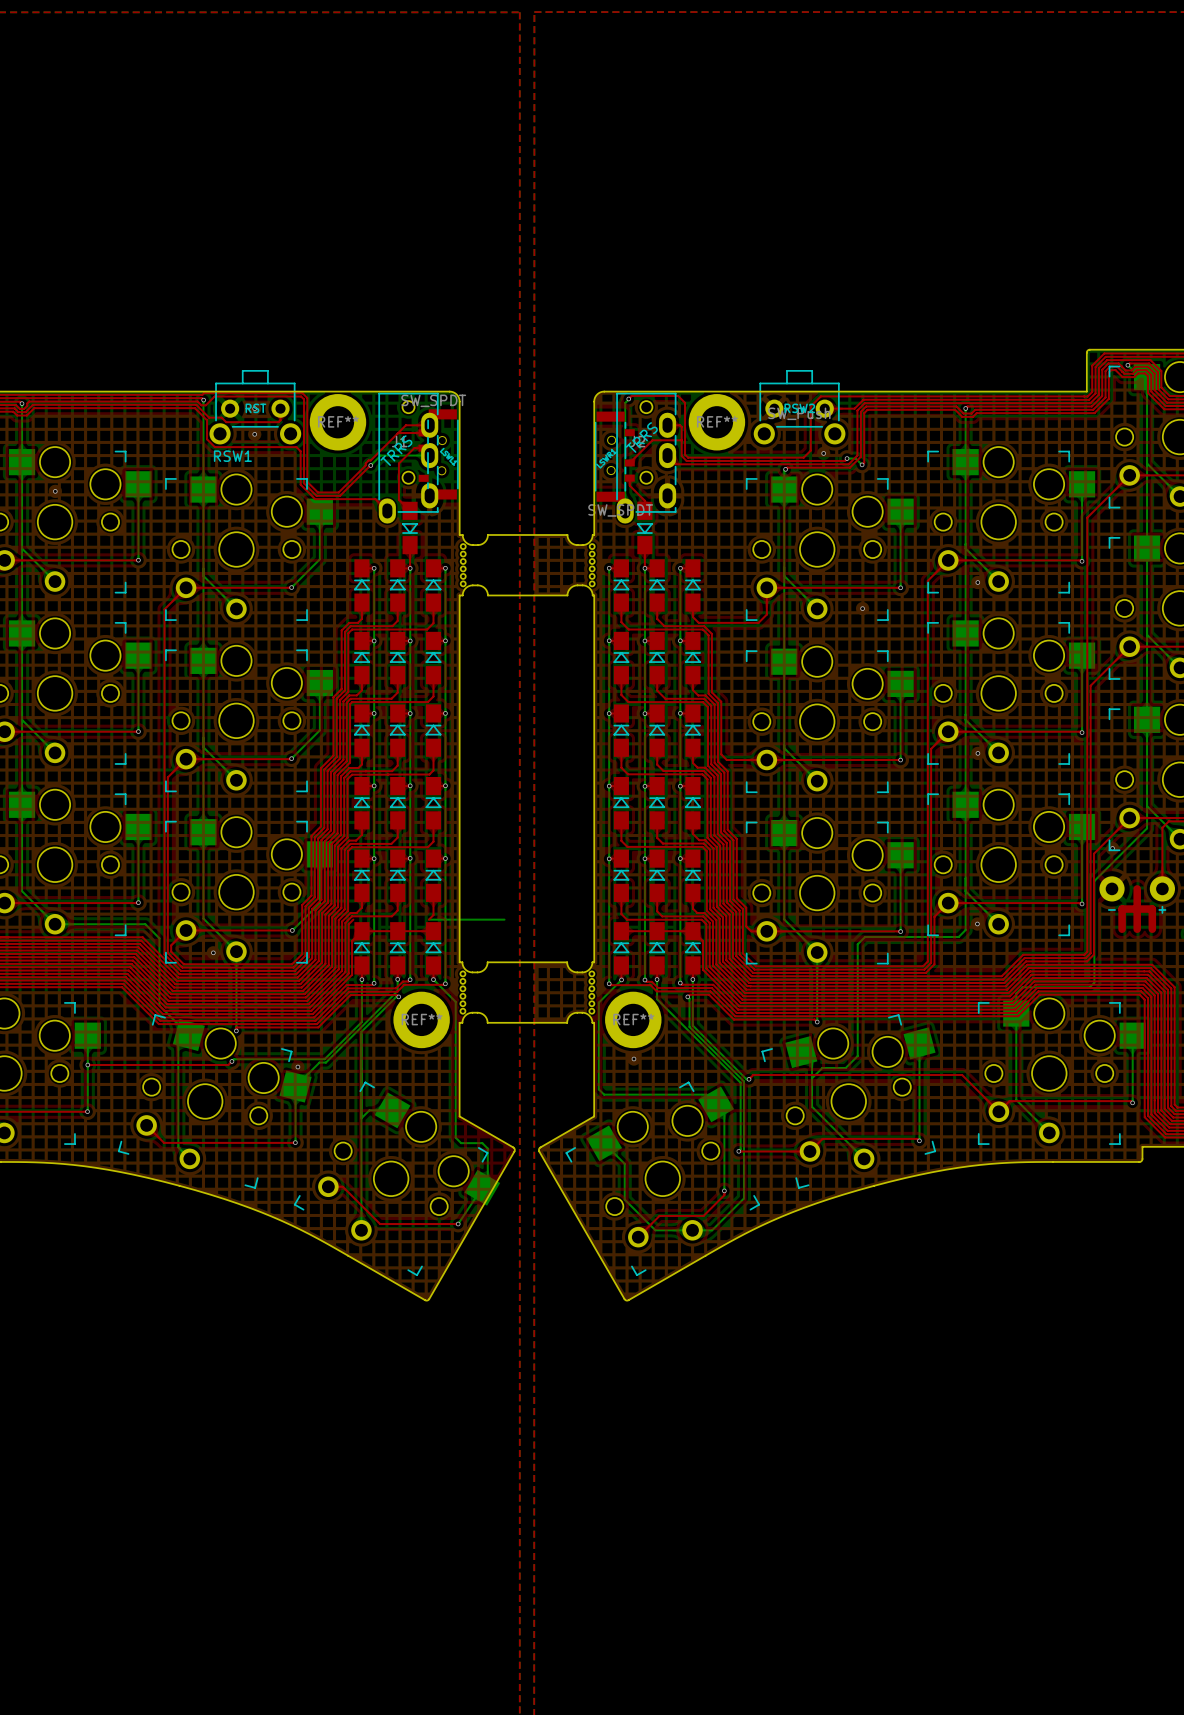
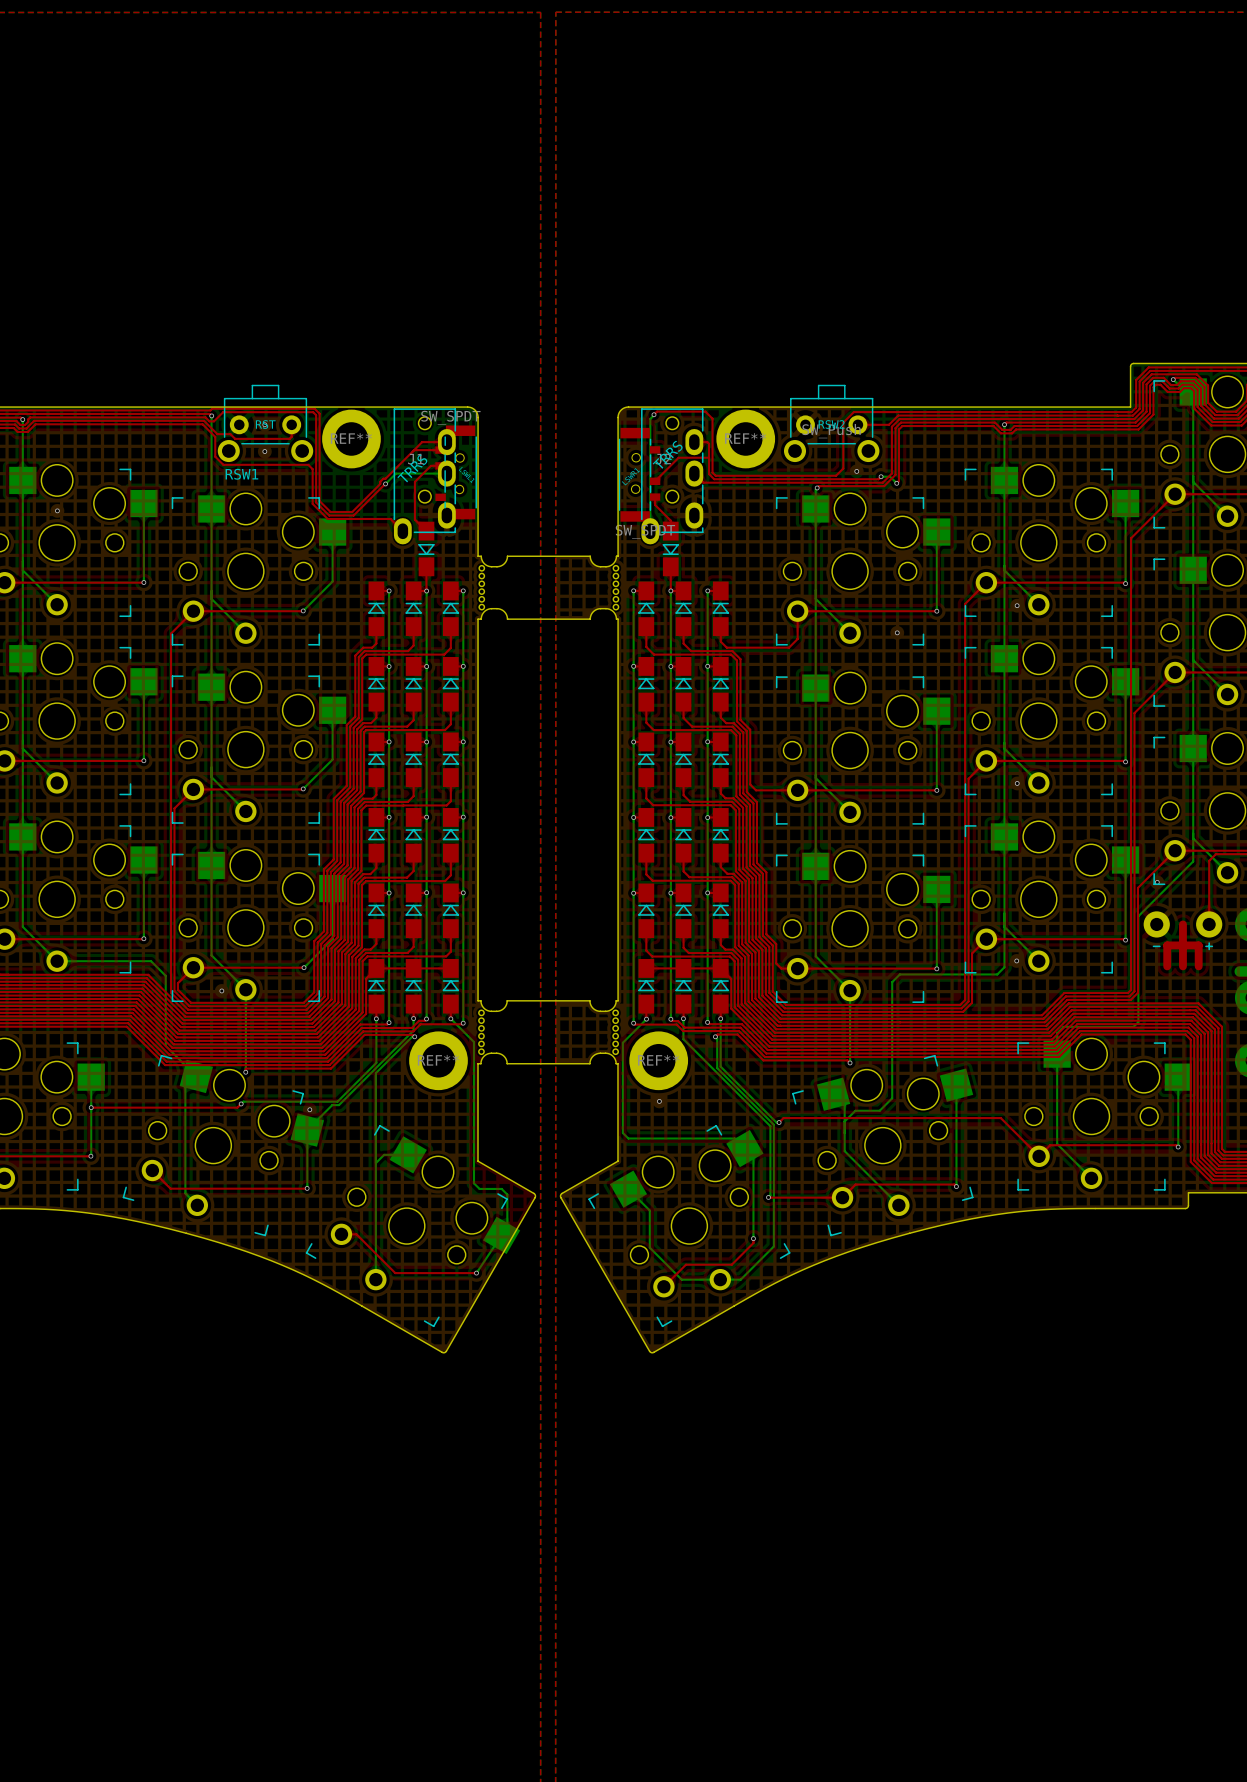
top track: none -> (367, 956) (446, 956)
bottom track: (428, 919) (504, 919) -> none

